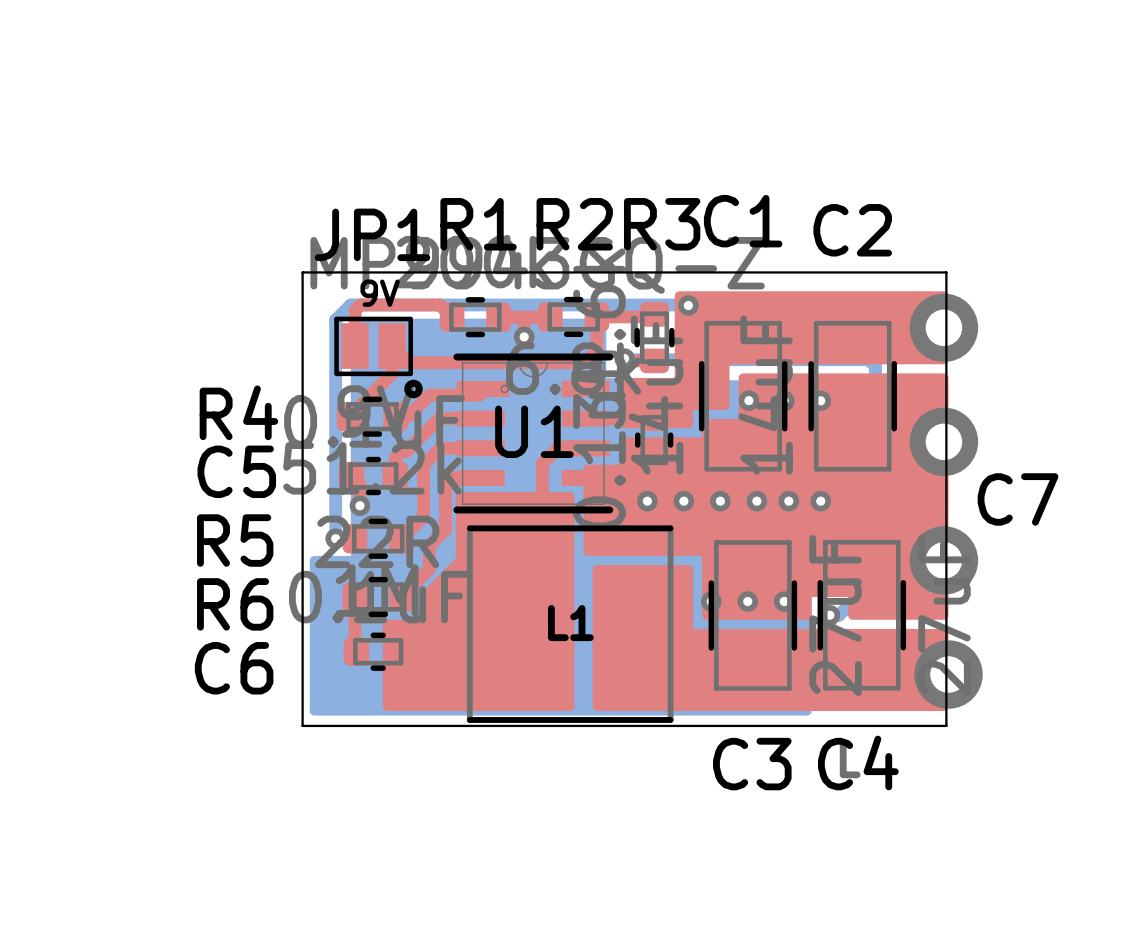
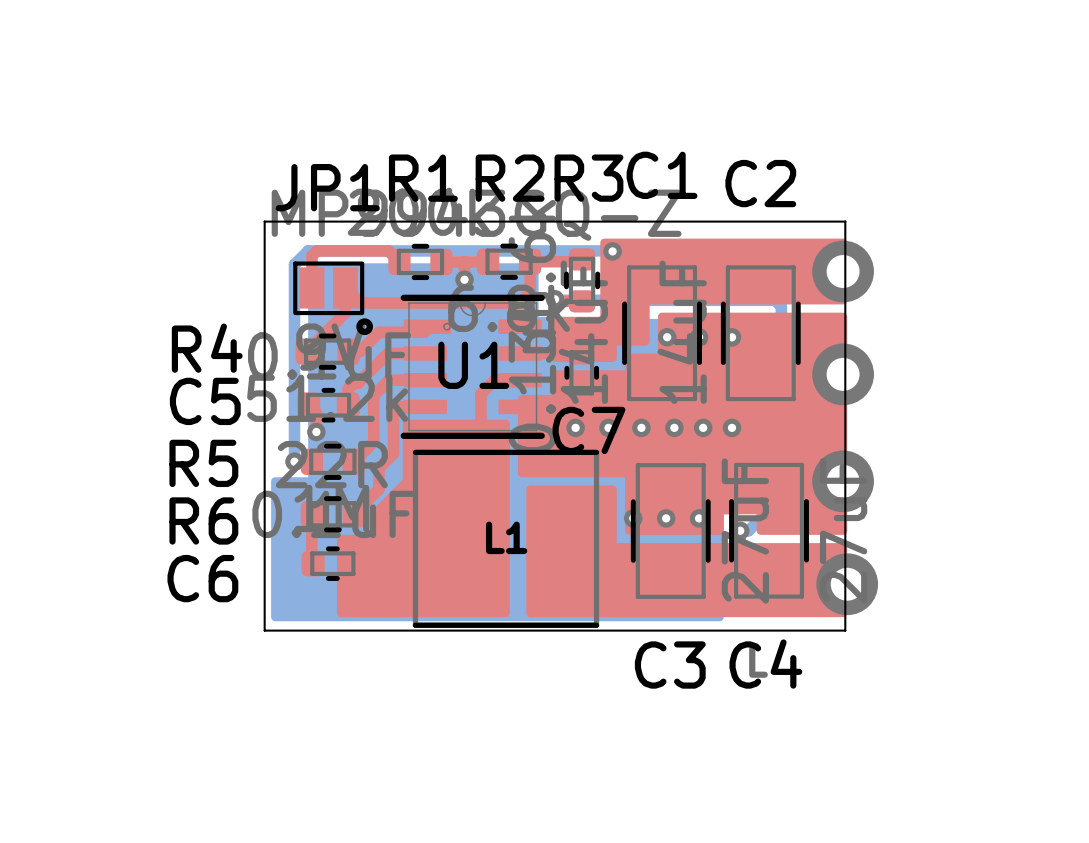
text: 9V (380, 293) -> none
C7 name position: C7 (1018, 499) -> C7 (588, 430)

